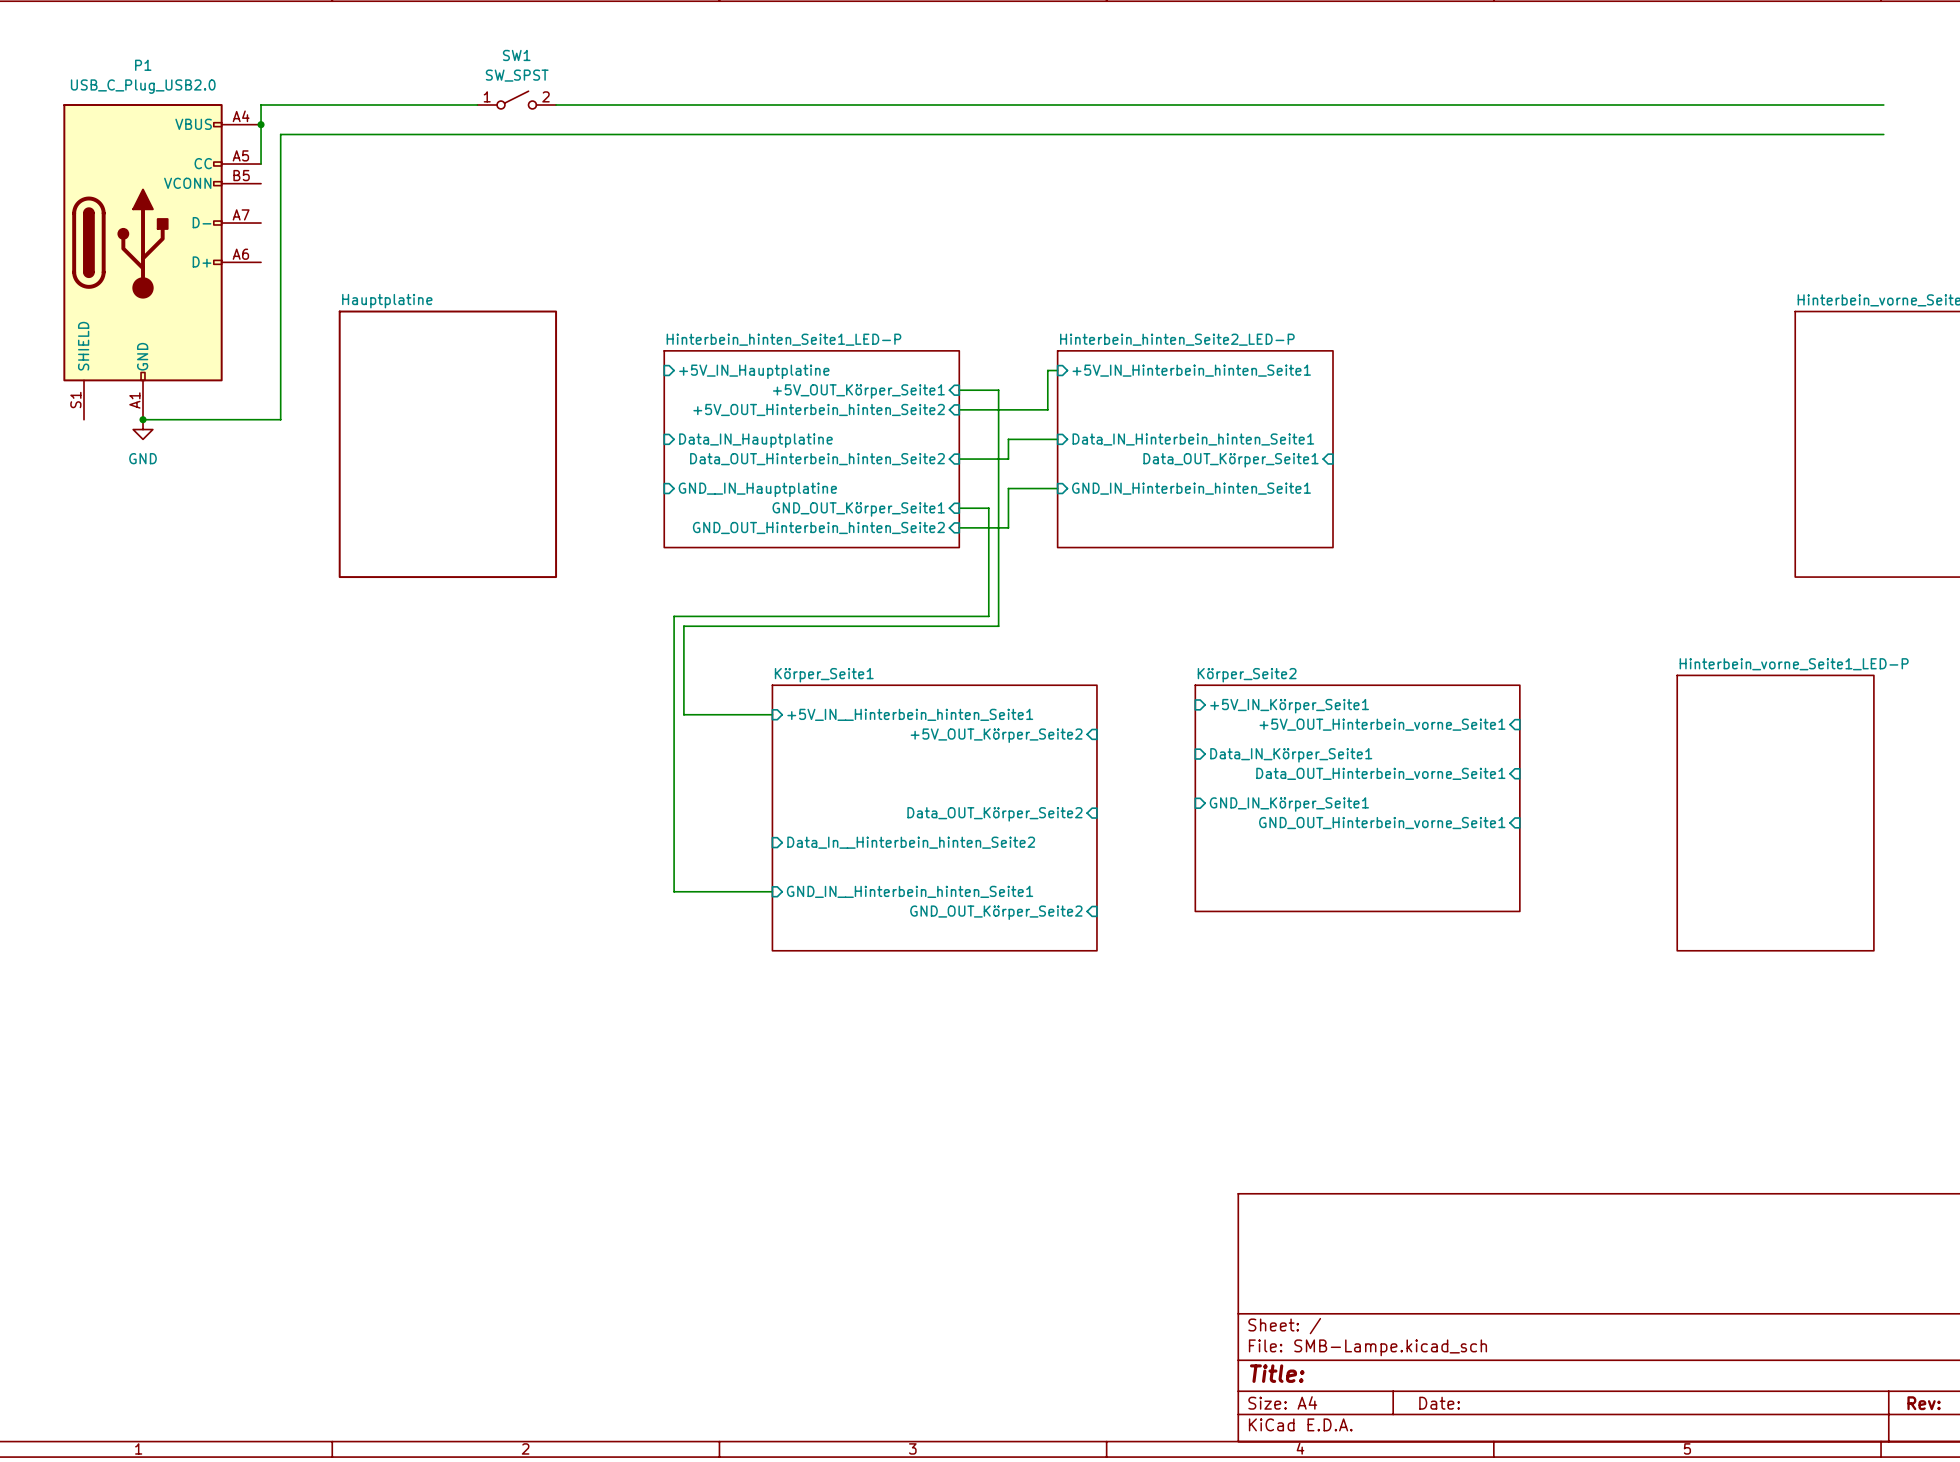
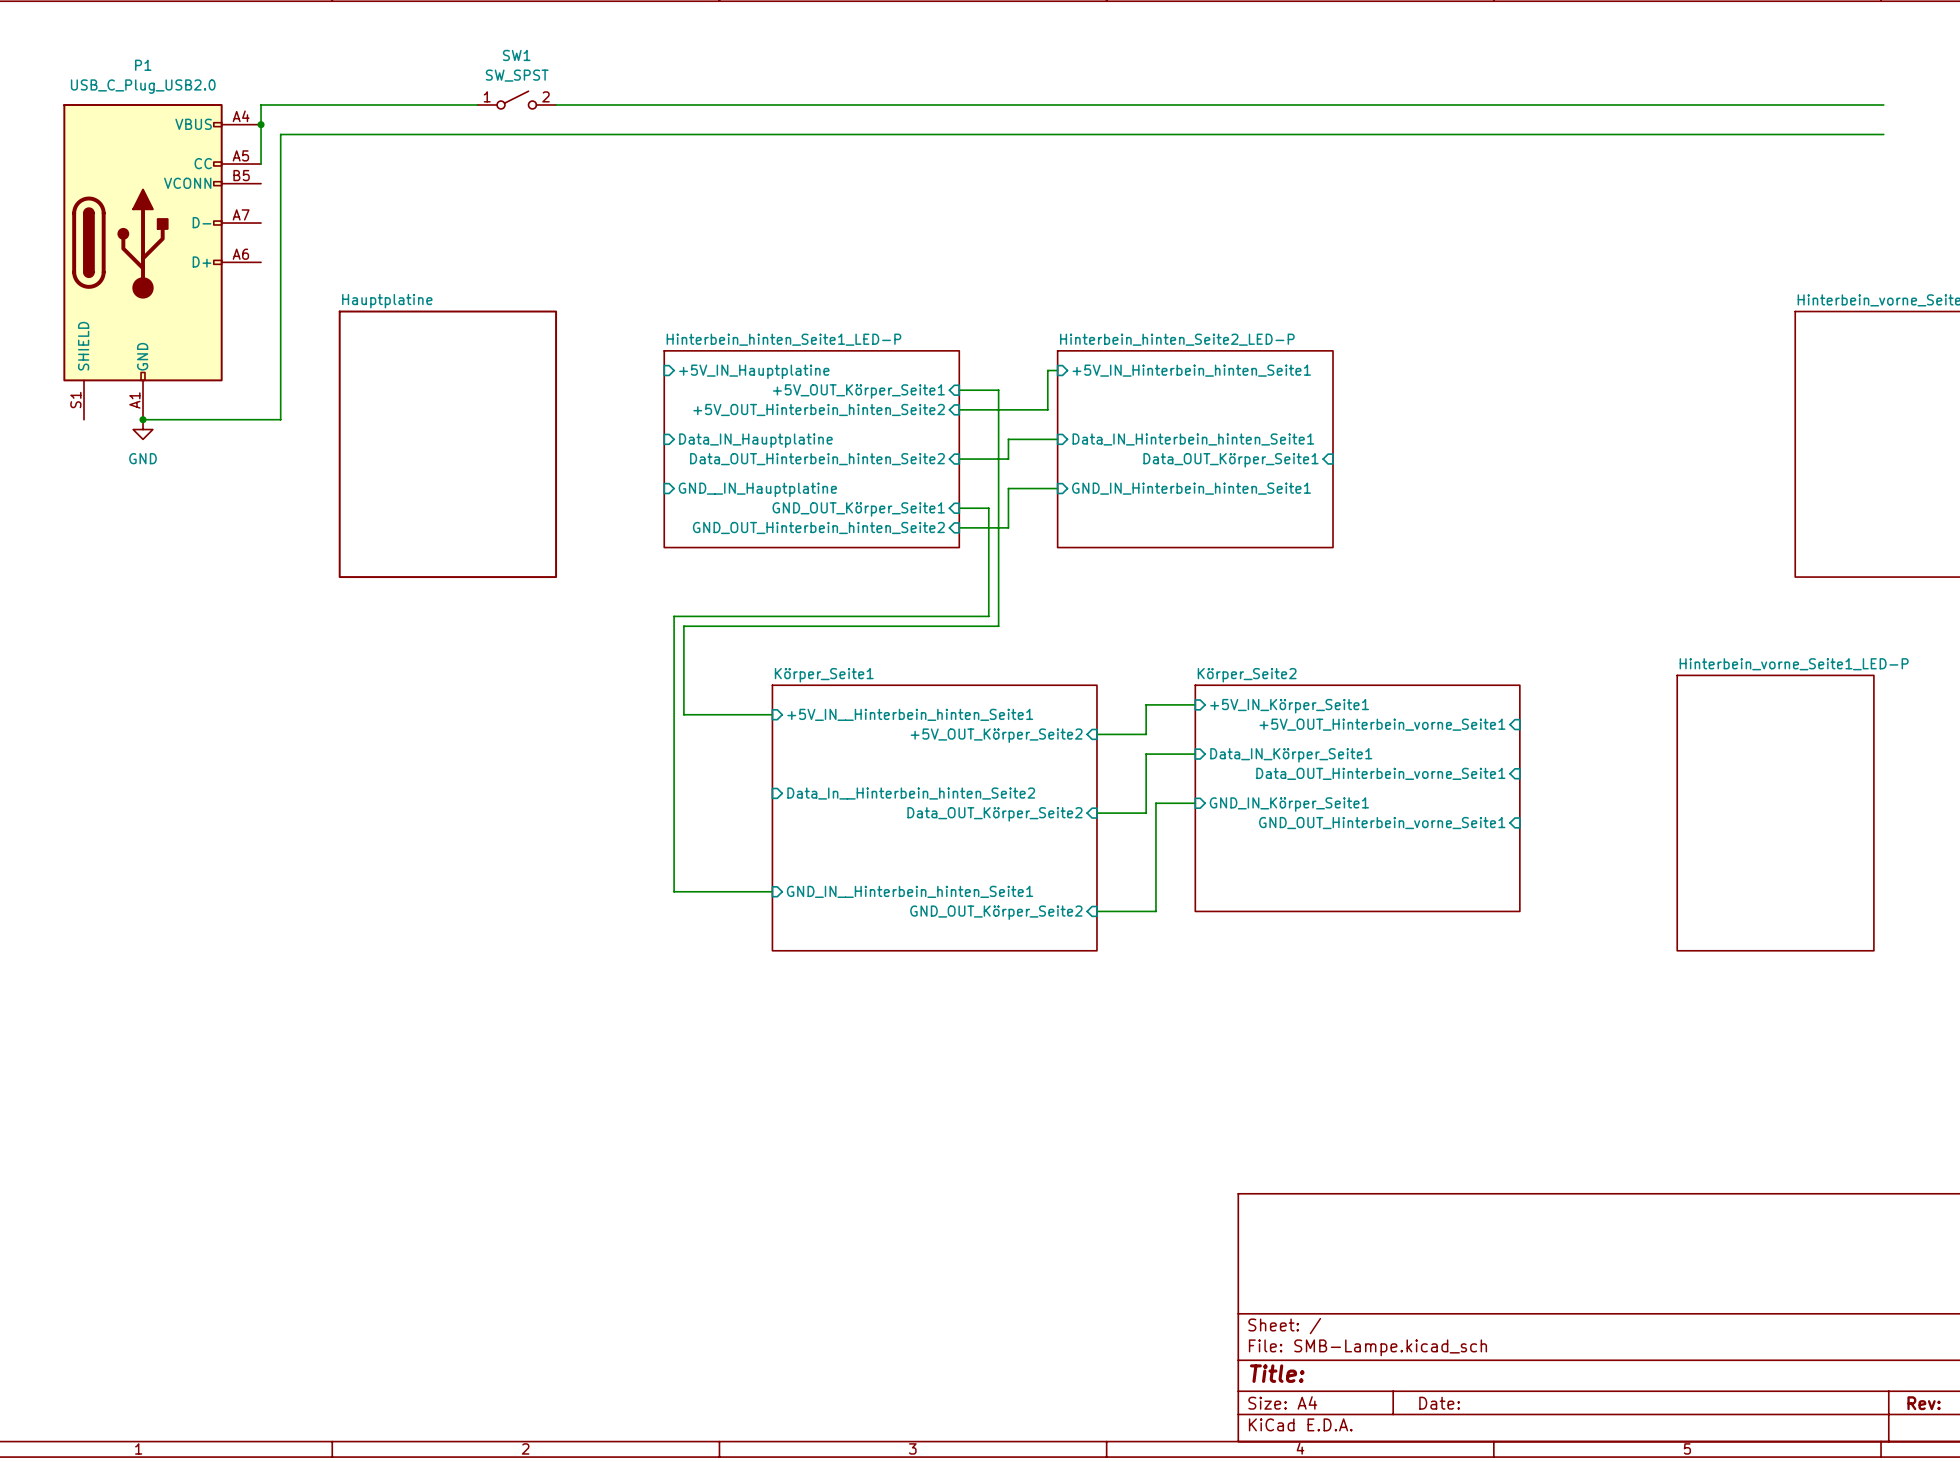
wire: none -> (1195, 704) (1146, 704) (1146, 734) (1096, 734)
wire: none -> (1195, 754) (1146, 754) (1146, 813) (1096, 813)
wire: none -> (1195, 803) (1155, 803) (1155, 911) (1096, 911)
sheet pin position: Data_In__Hinterbein_hinten_Seite2 (911, 842) -> Data_In__Hinterbein_hinten_Seite2 (911, 793)

